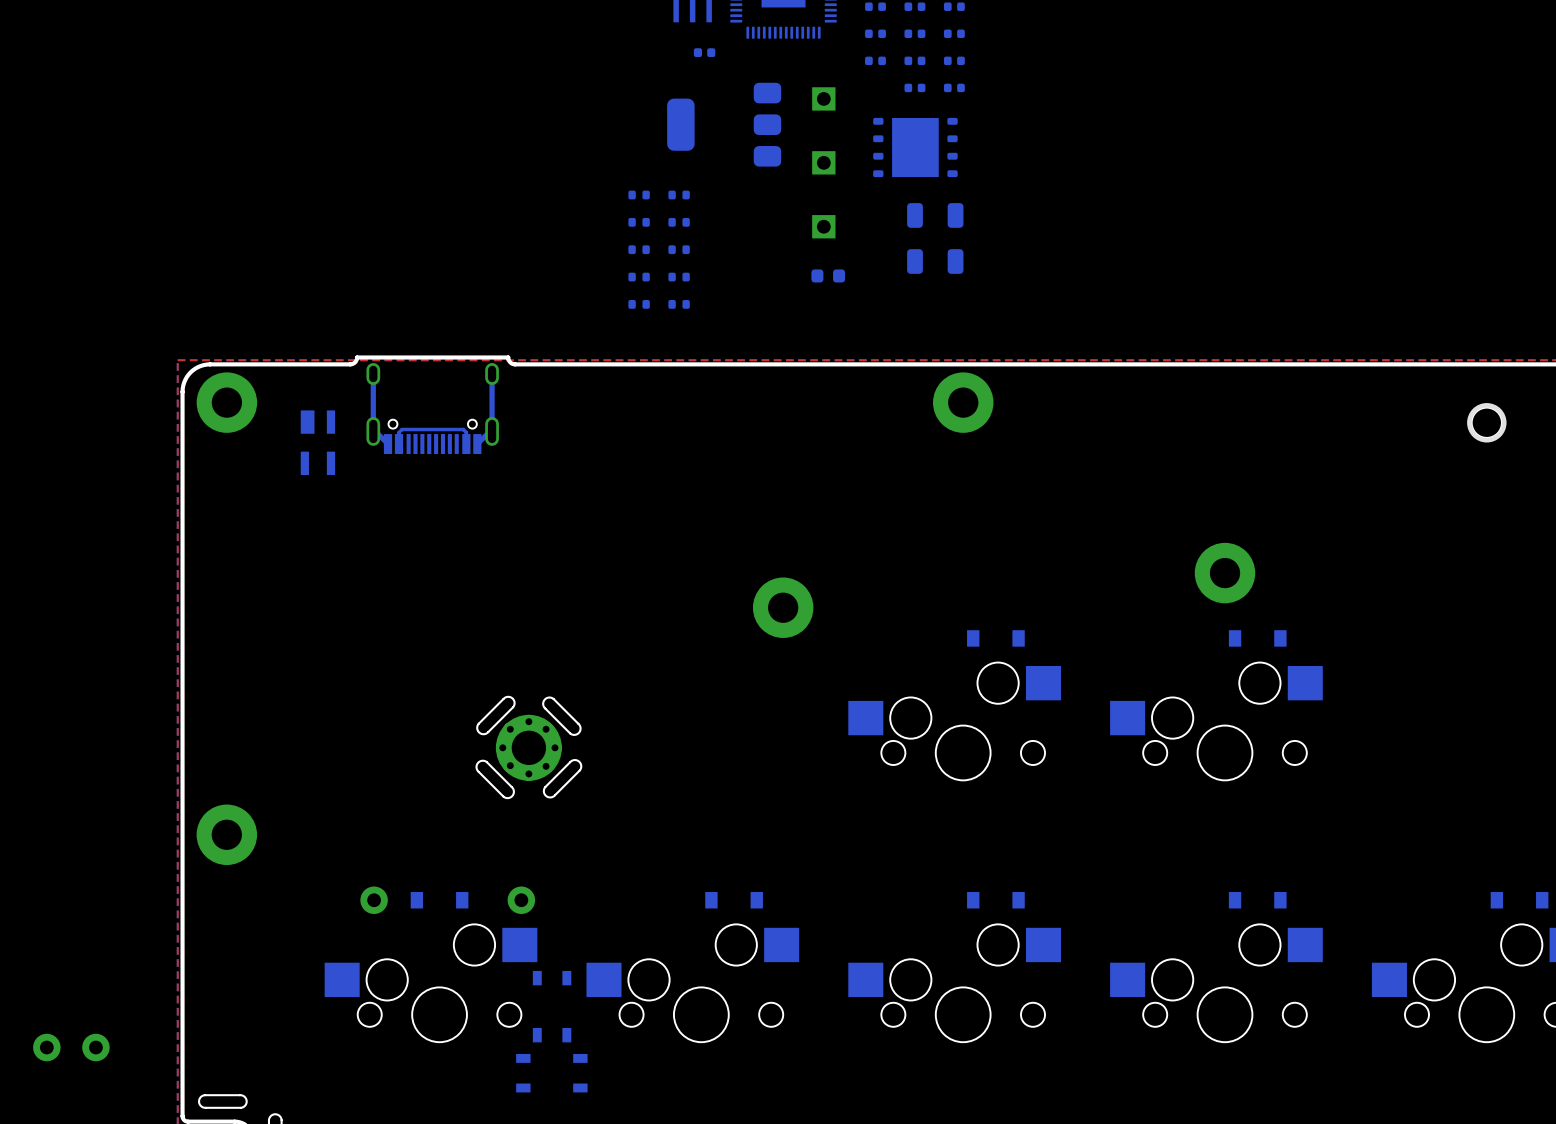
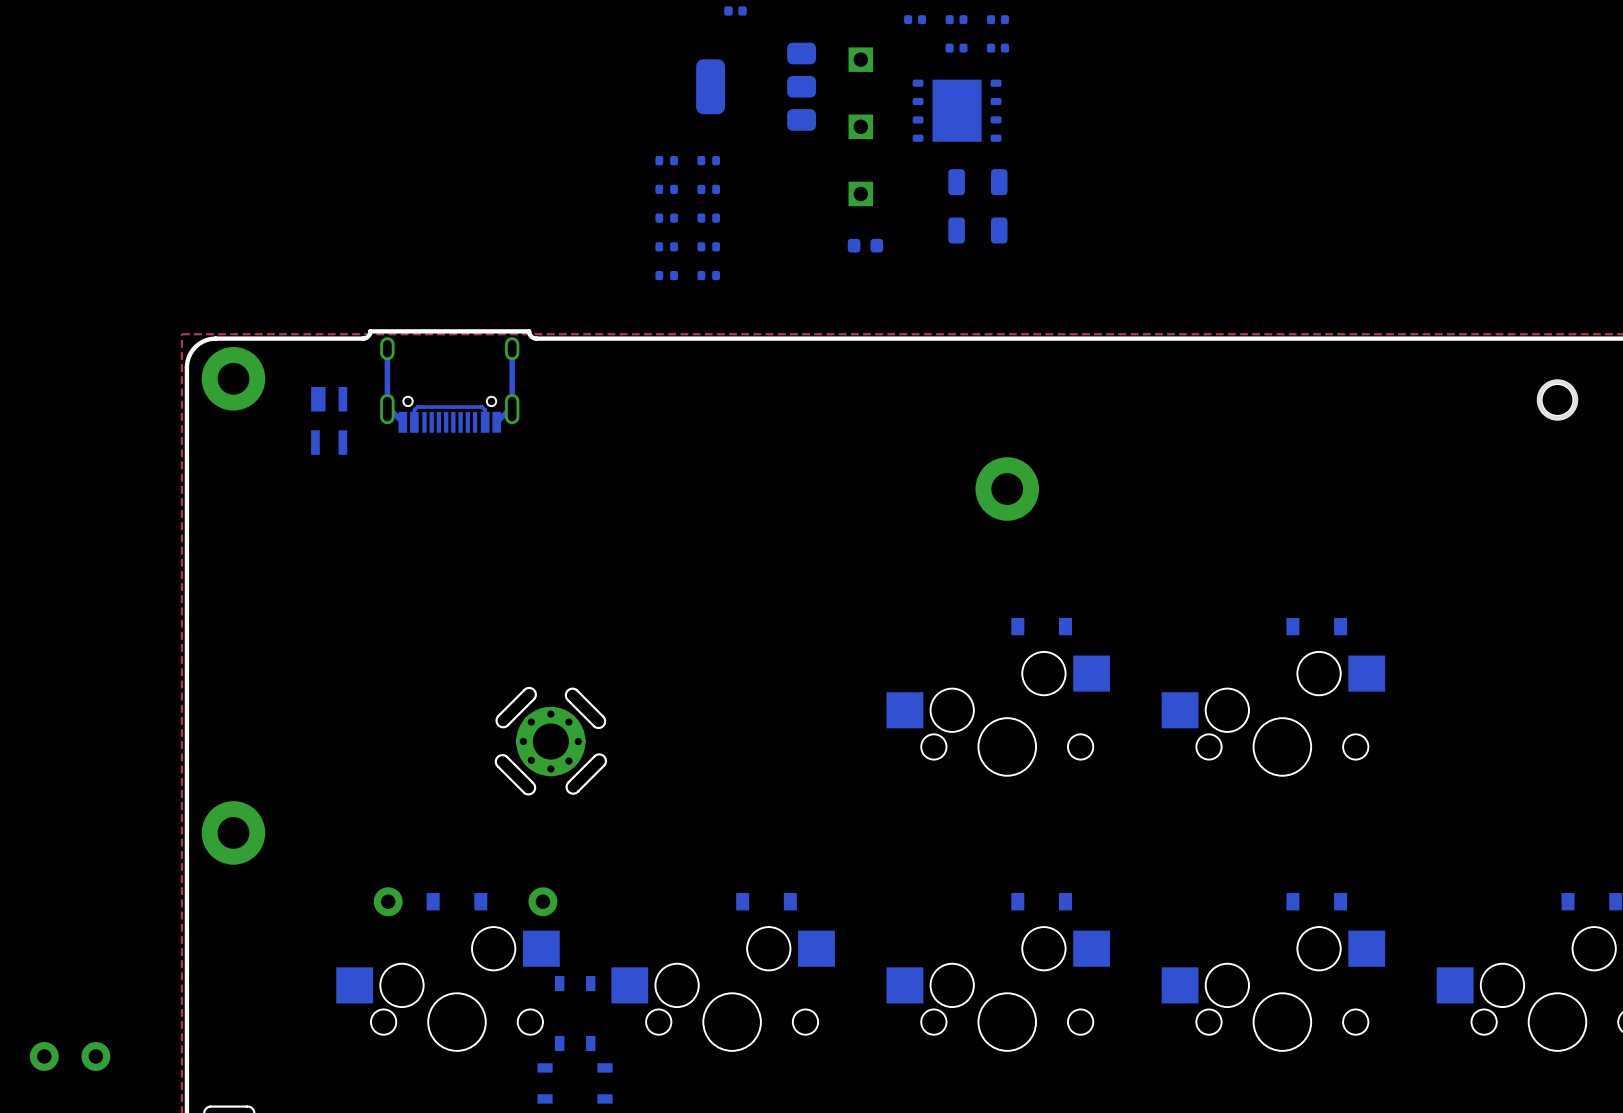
part: (963, 402) -> none
part: none -> (1007, 489)
part: (1225, 573) -> none
part: (783, 607) -> none

